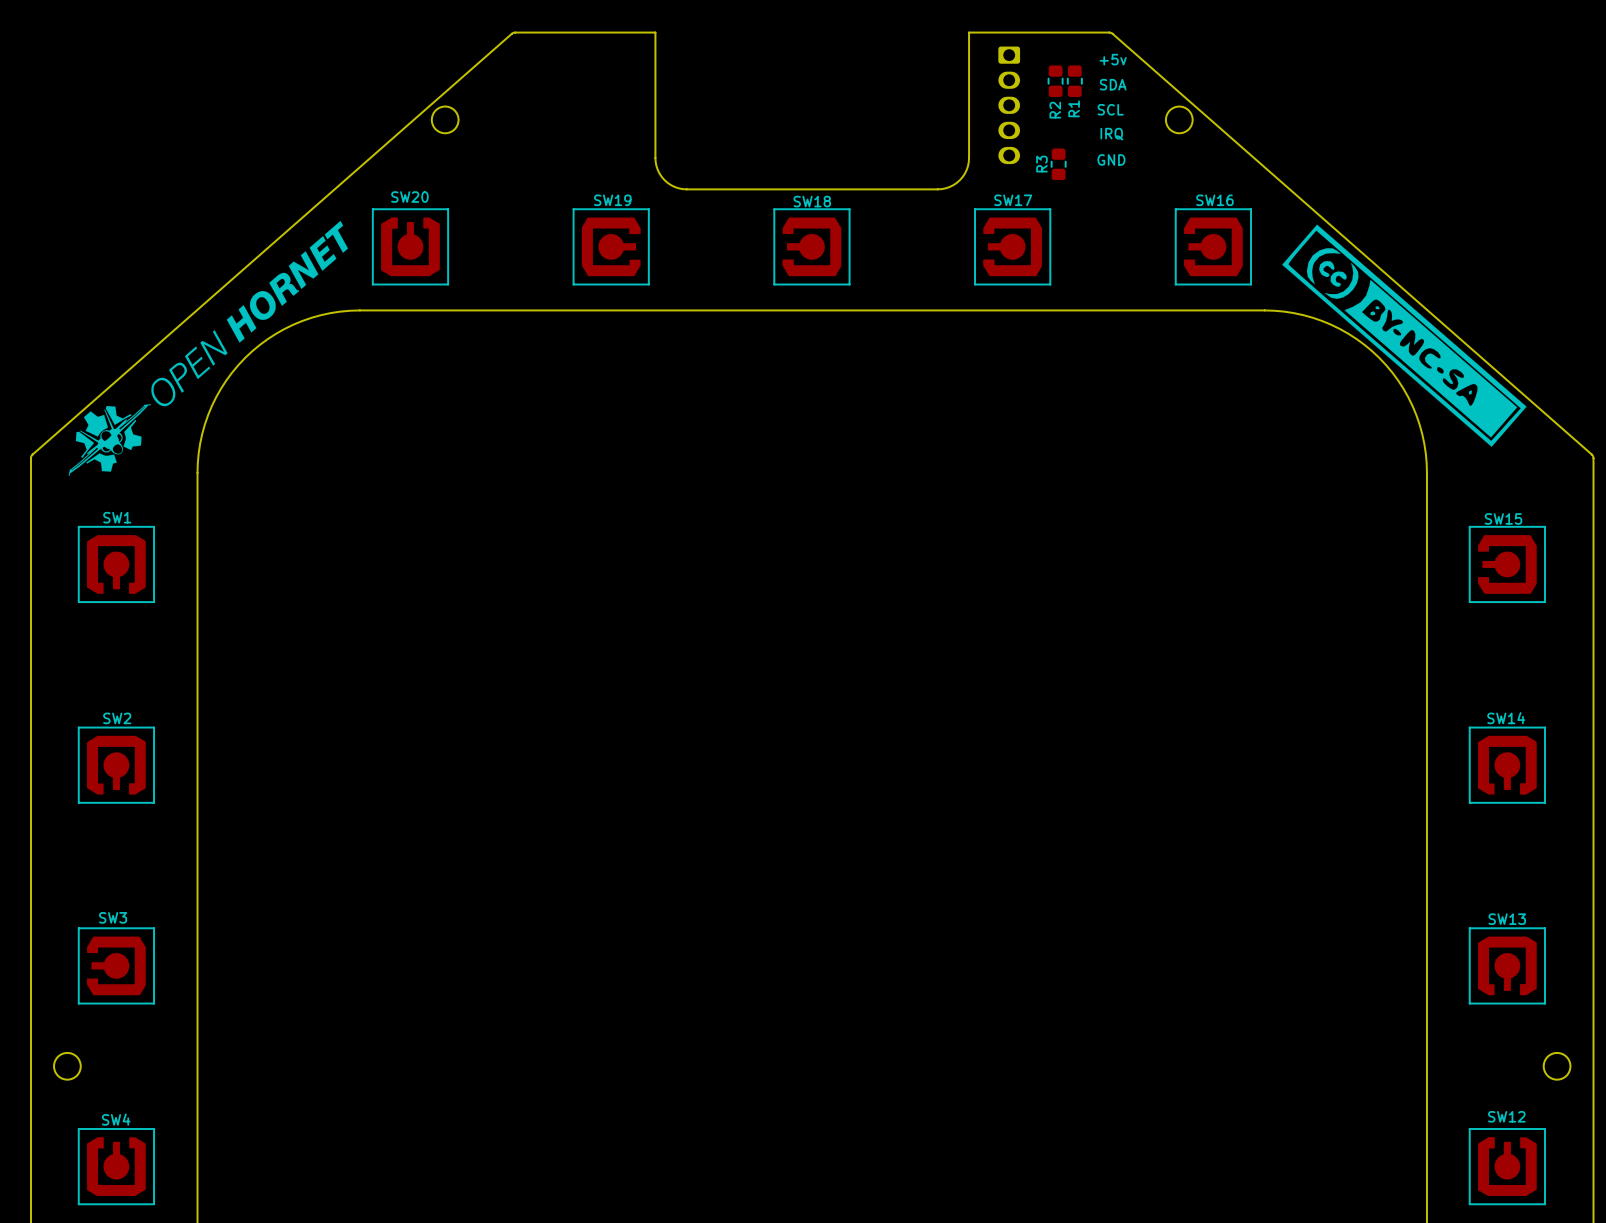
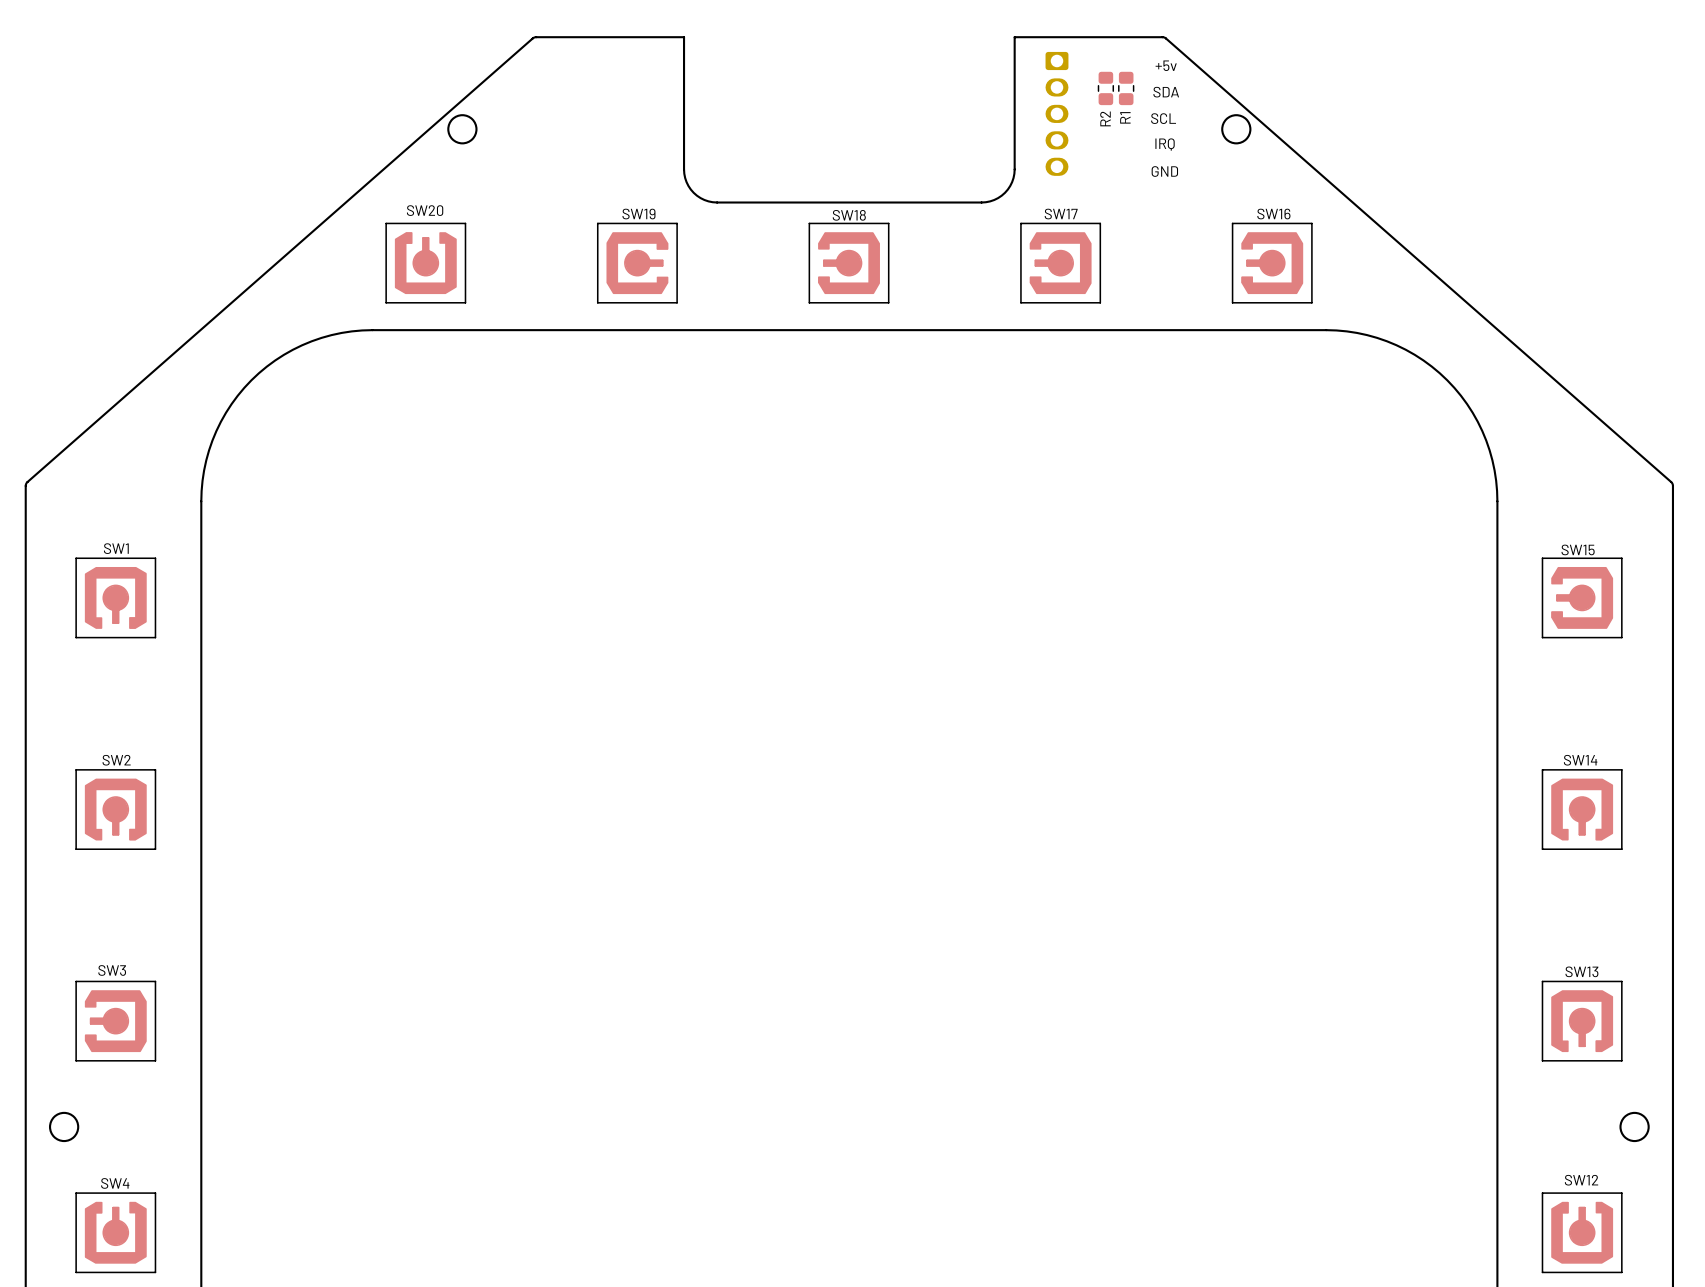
R3: (1058, 164) -> none
drawing: [68, 220, 349, 477] -> none
drawing: [1282, 224, 1527, 447] -> none

